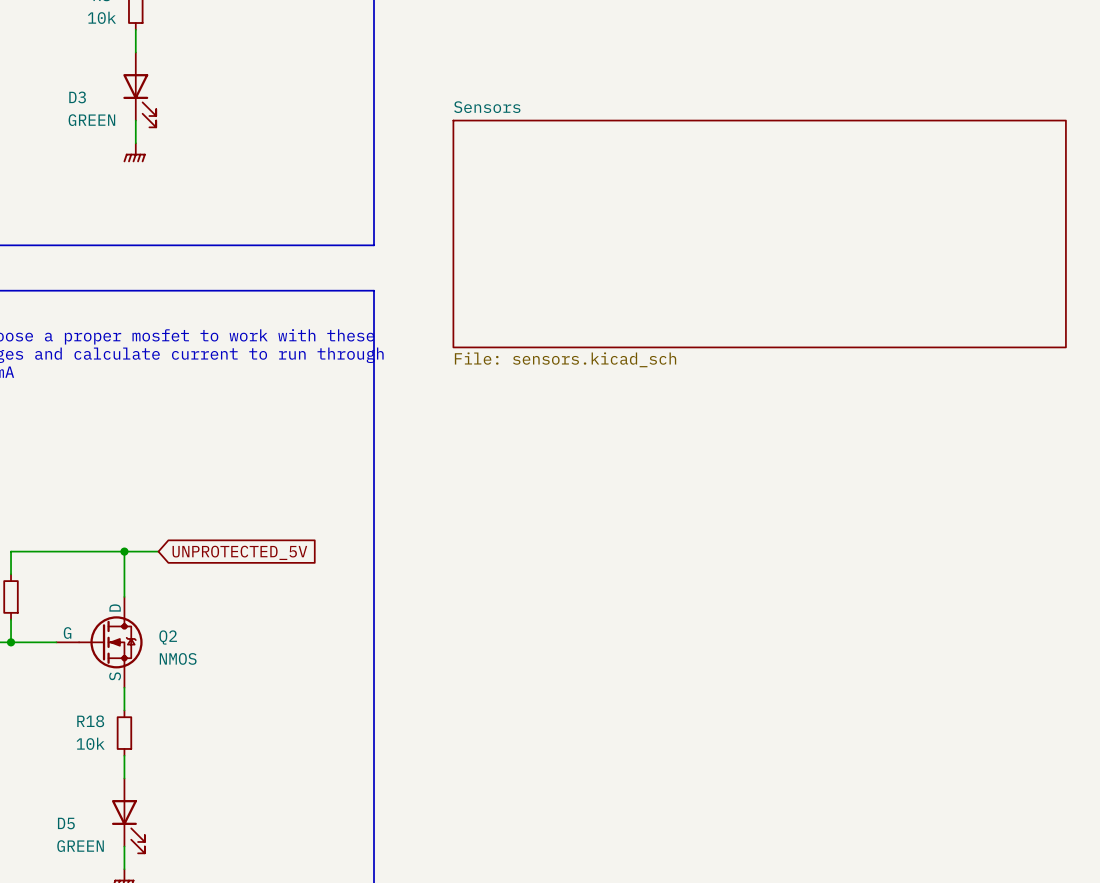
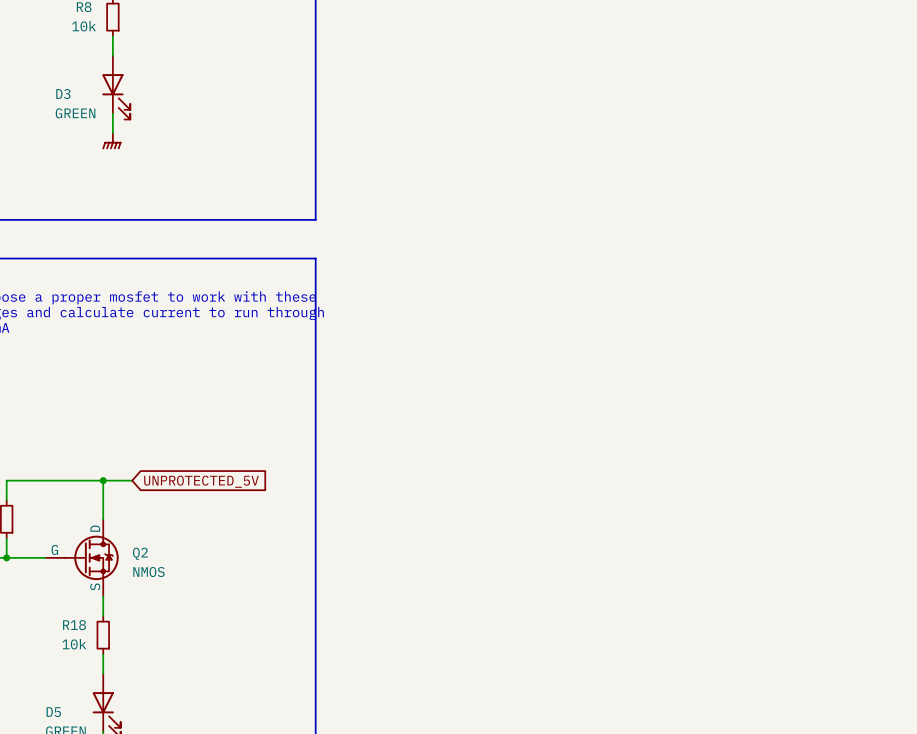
sheet Sensors: File: sensors.kicad_sch (759, 233) -> none

